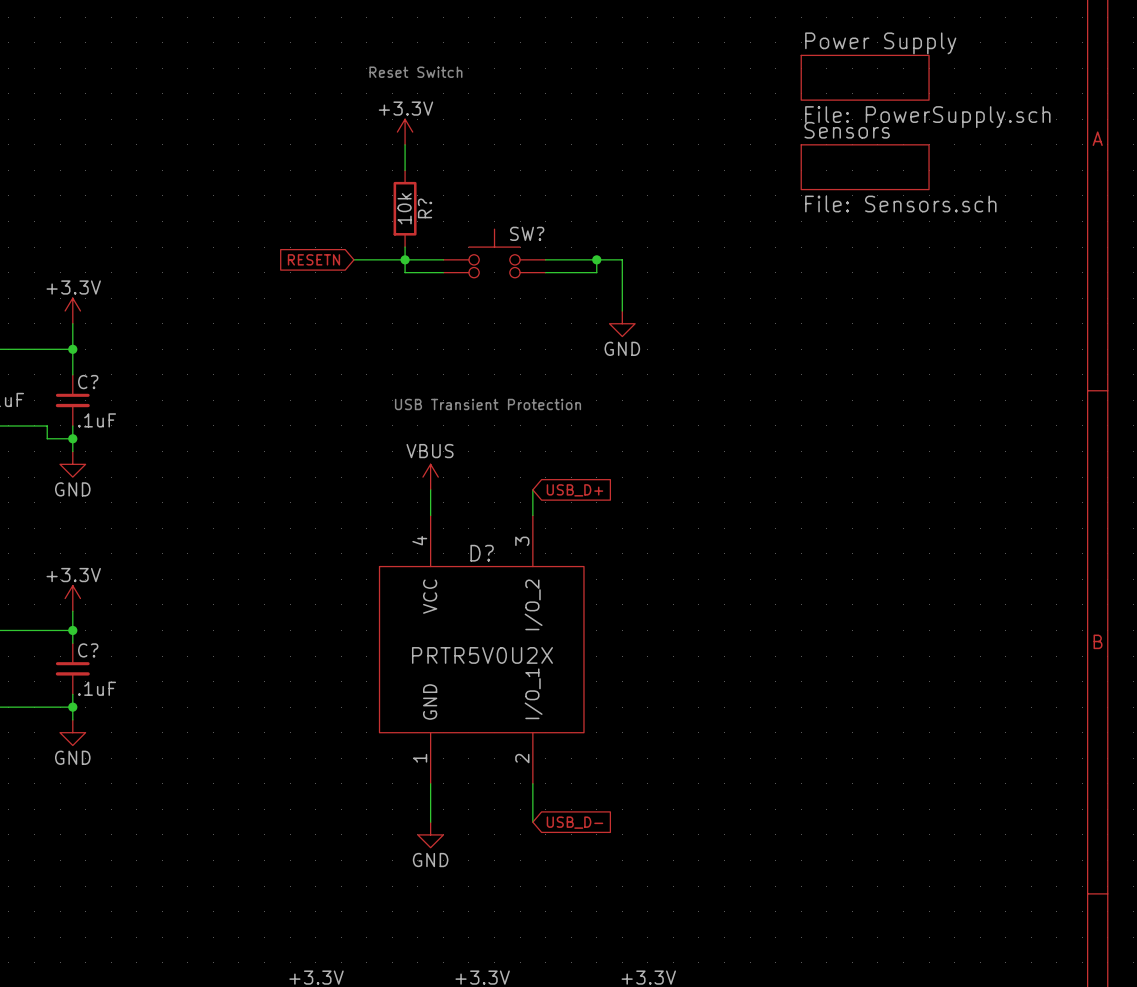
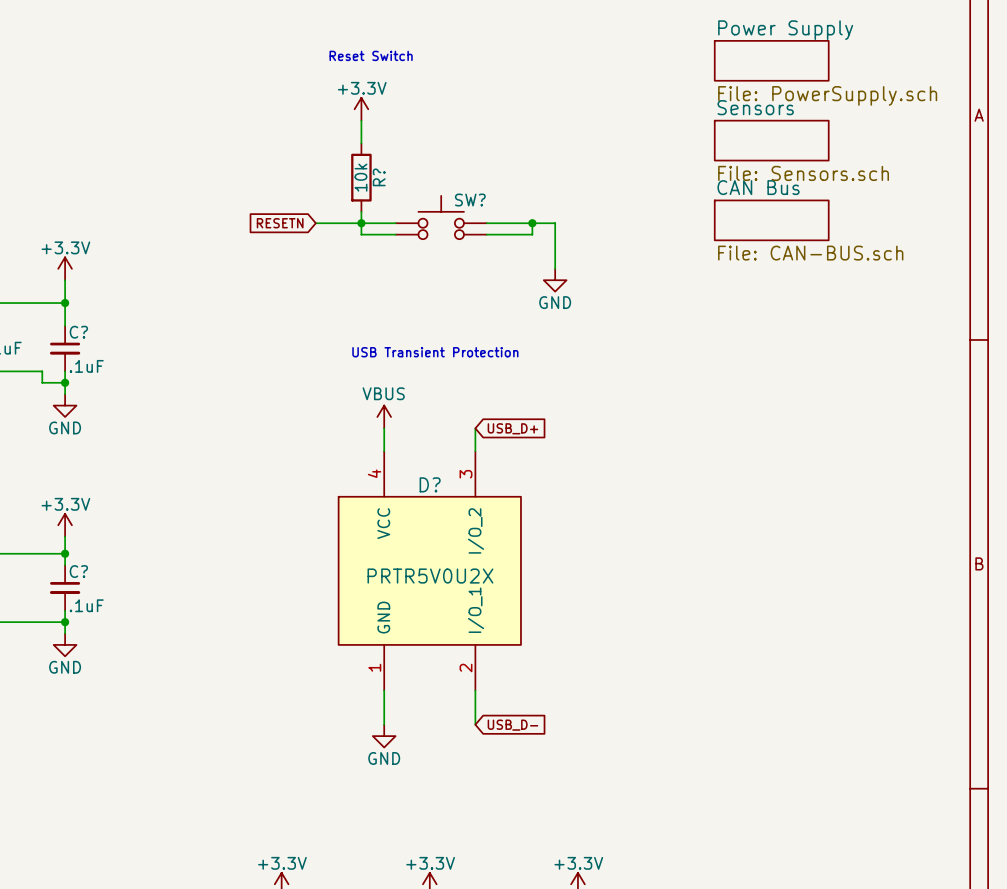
sheet CAN Bus: none -> File: CAN-BUS.sch (771, 220)

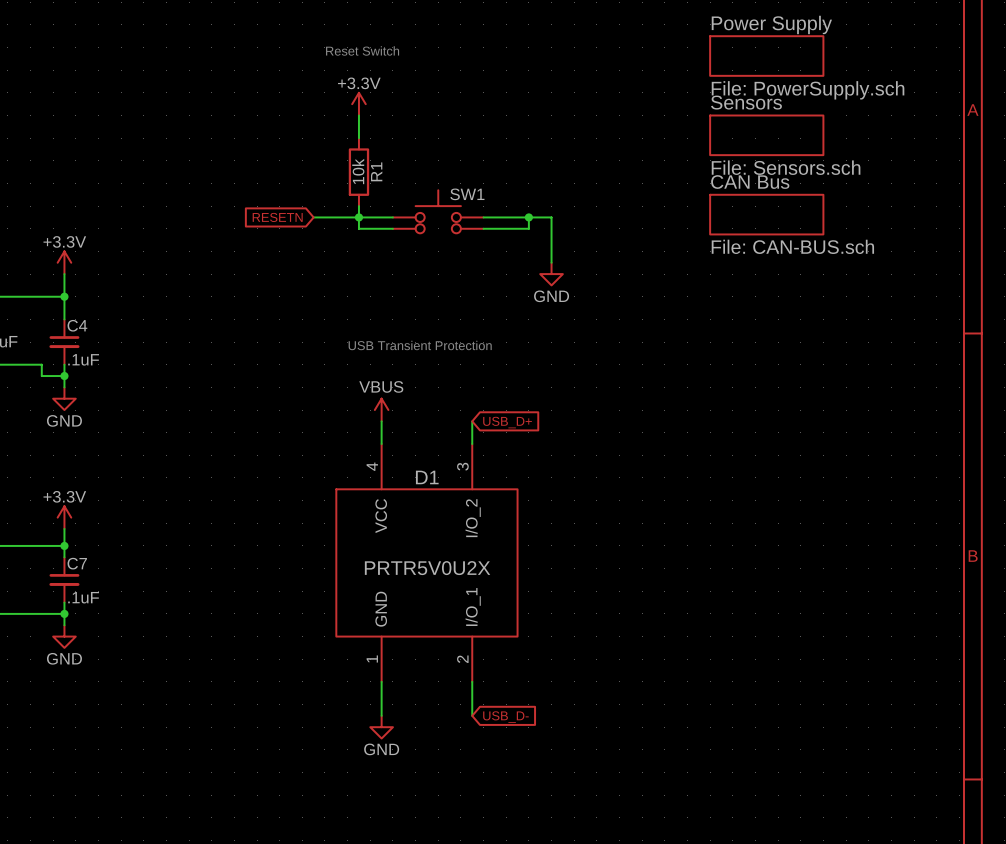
R? name: R? (379, 177) -> R1 (376, 171)
SW? name: SW? (470, 200) -> SW1 (467, 194)
C? name: C? (78, 332) -> C4 (77, 325)
D? name: D? (430, 484) -> D1 (427, 477)
C? name: C? (78, 571) -> C7 (77, 563)

